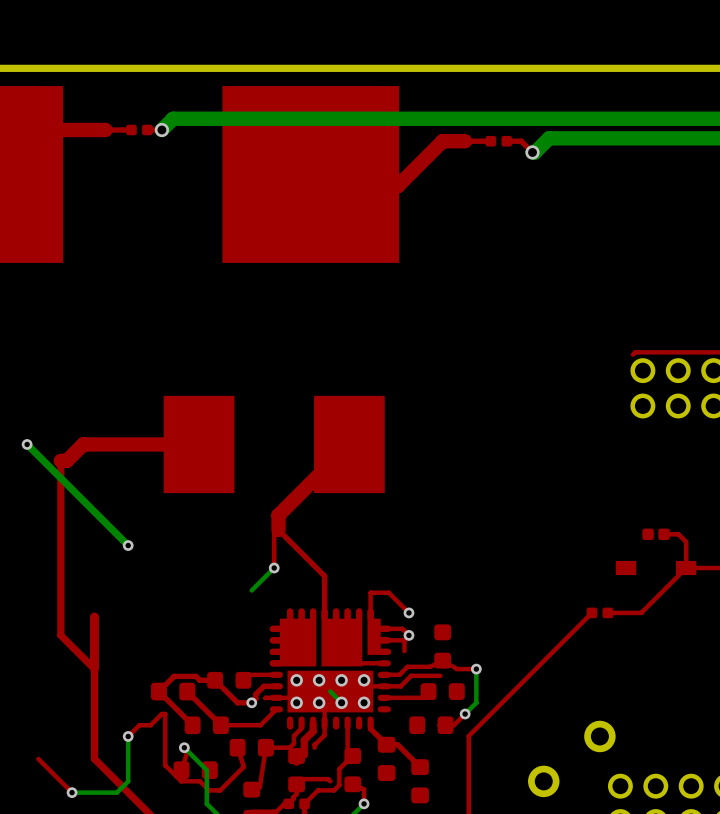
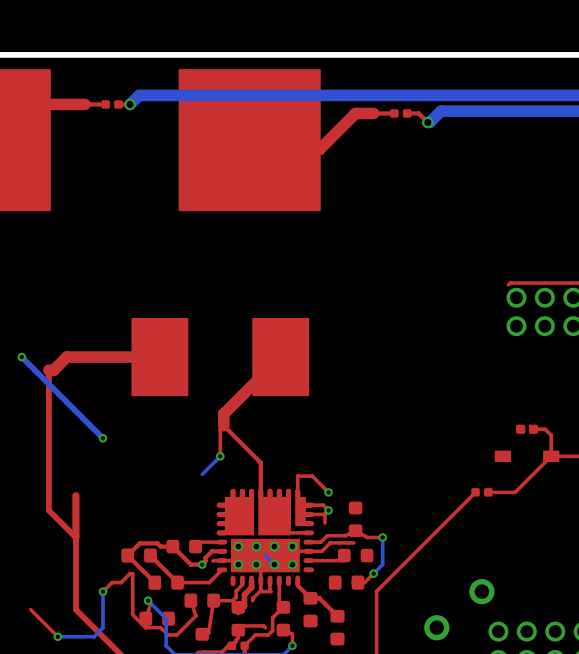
top track: none -> (270, 580) (270, 591) (261, 591)

